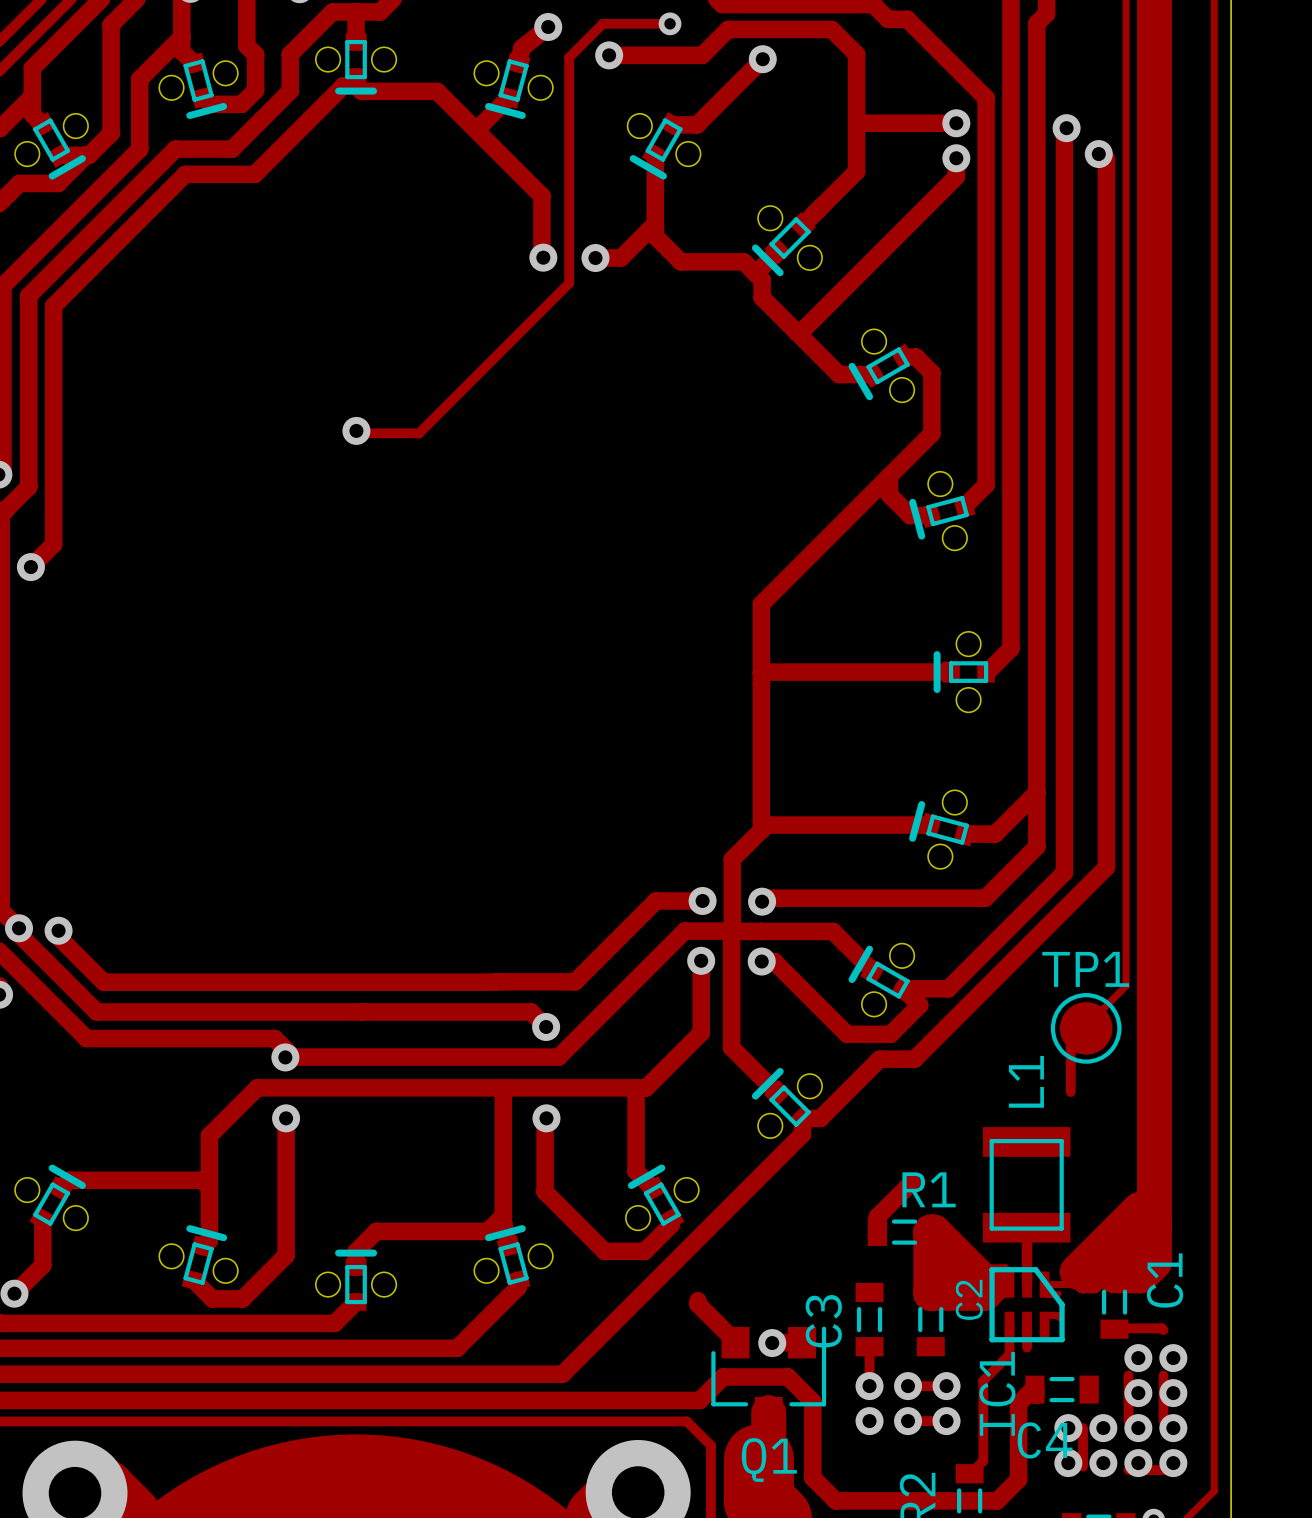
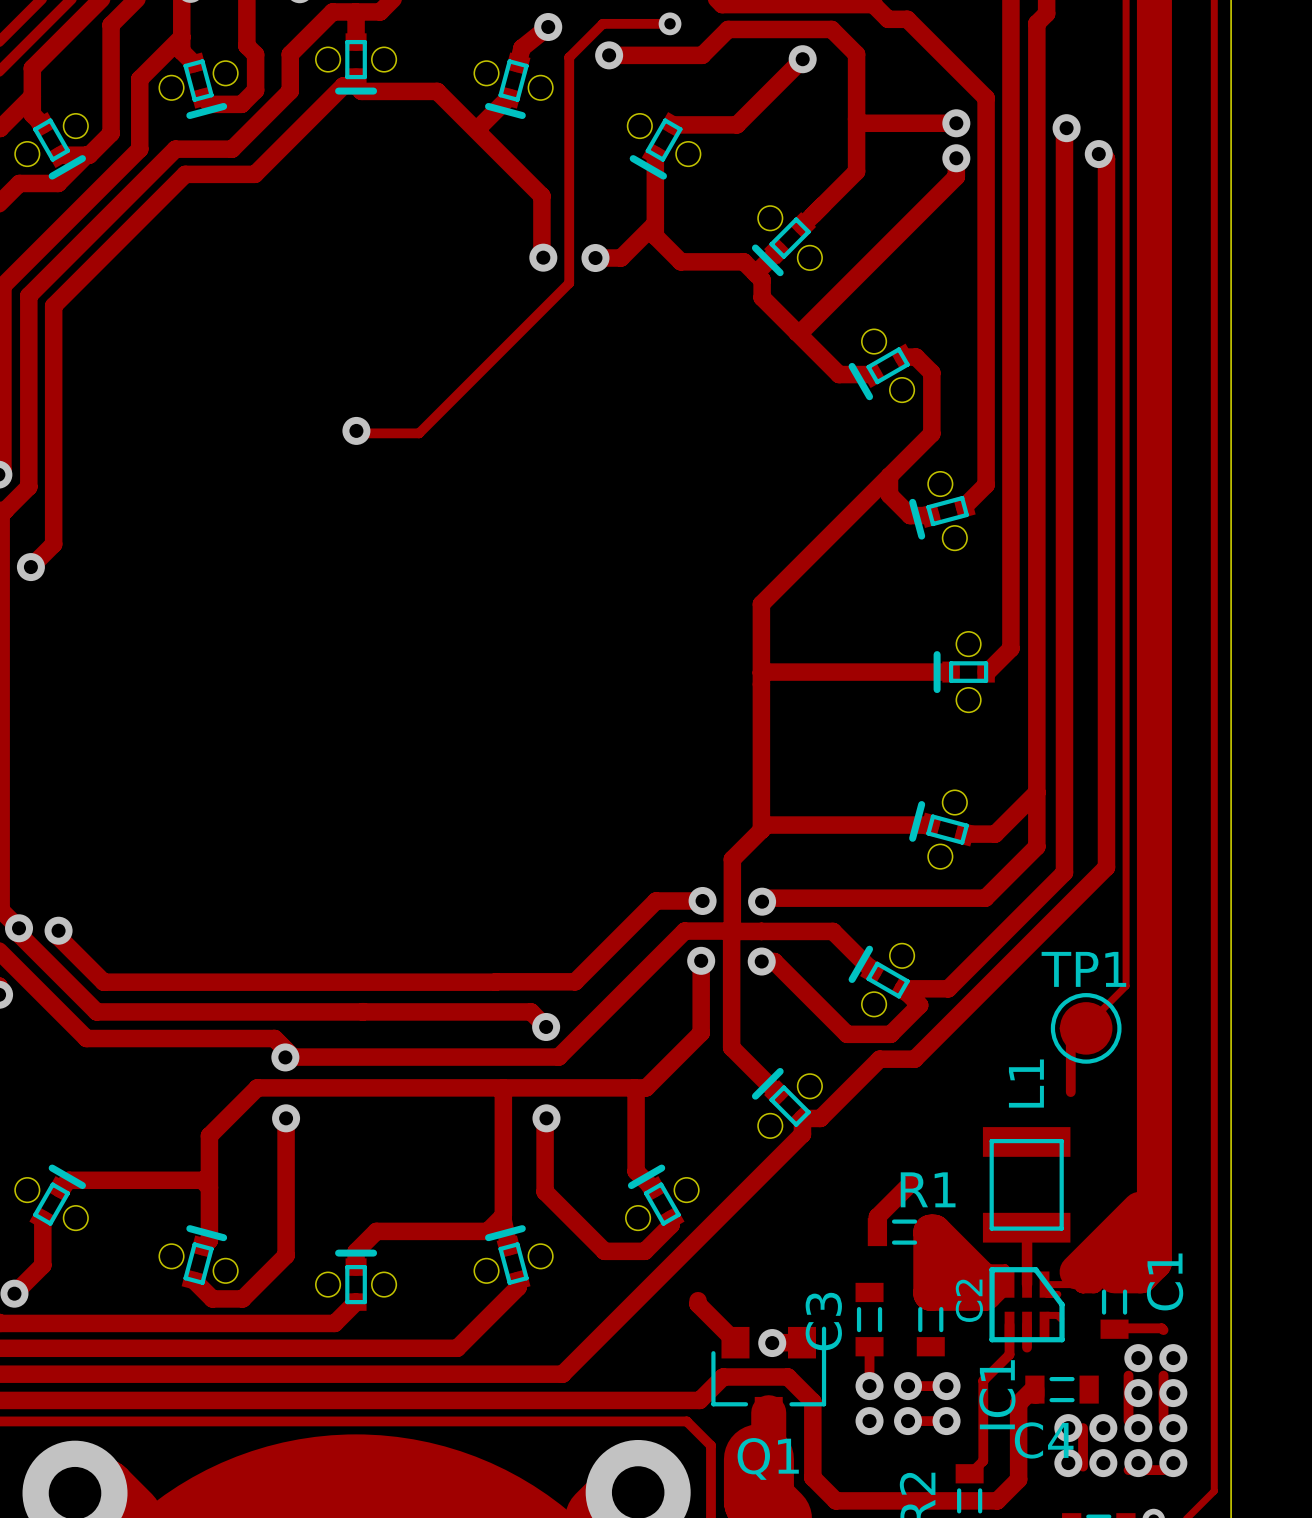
track: (762, 59) (697, 124) -> (802, 59) (736, 124) (697, 124)
via position: (762, 59) -> (802, 59)

